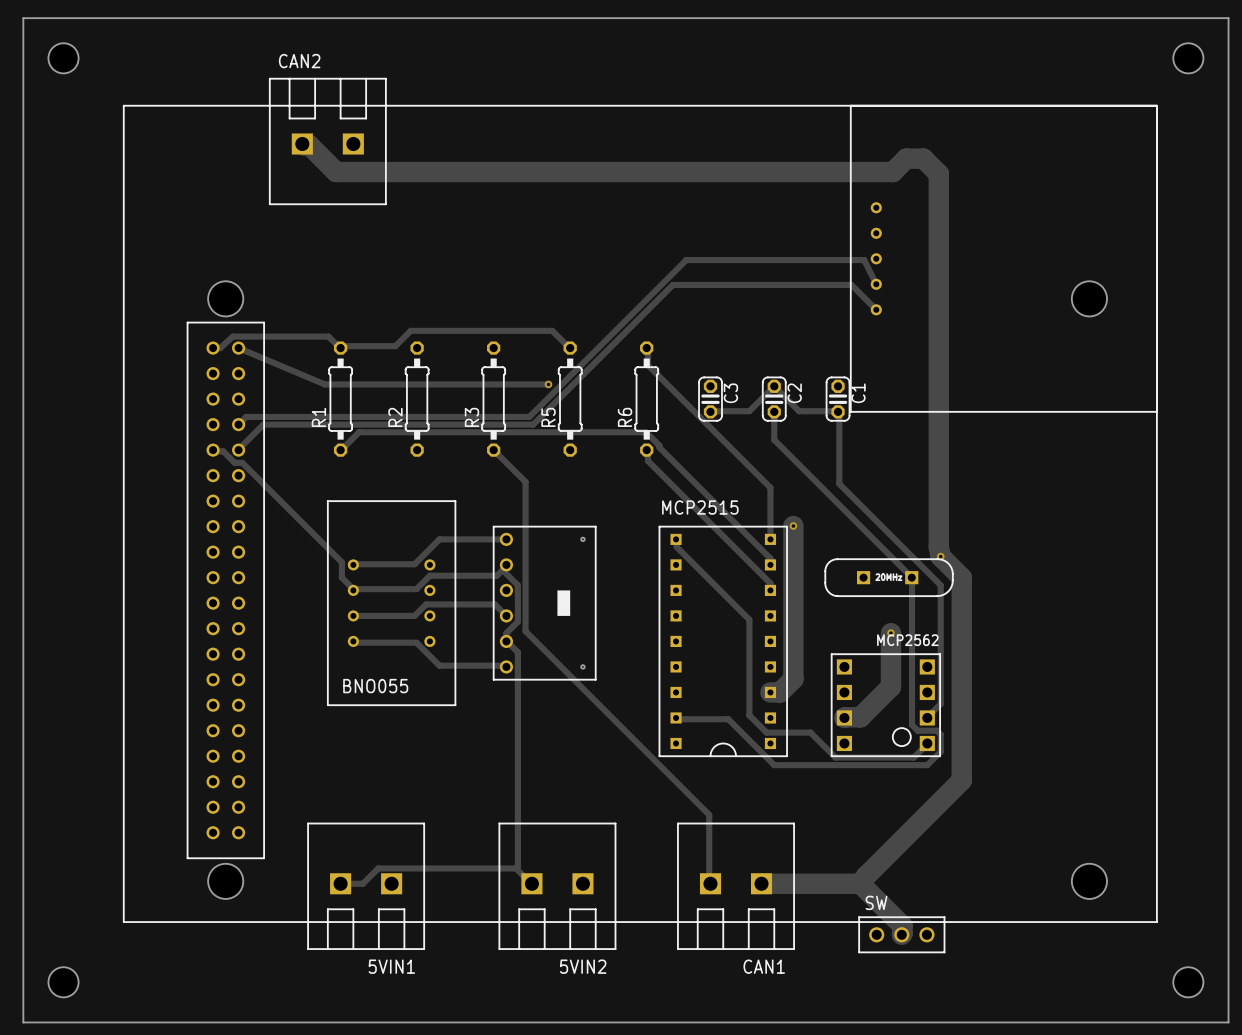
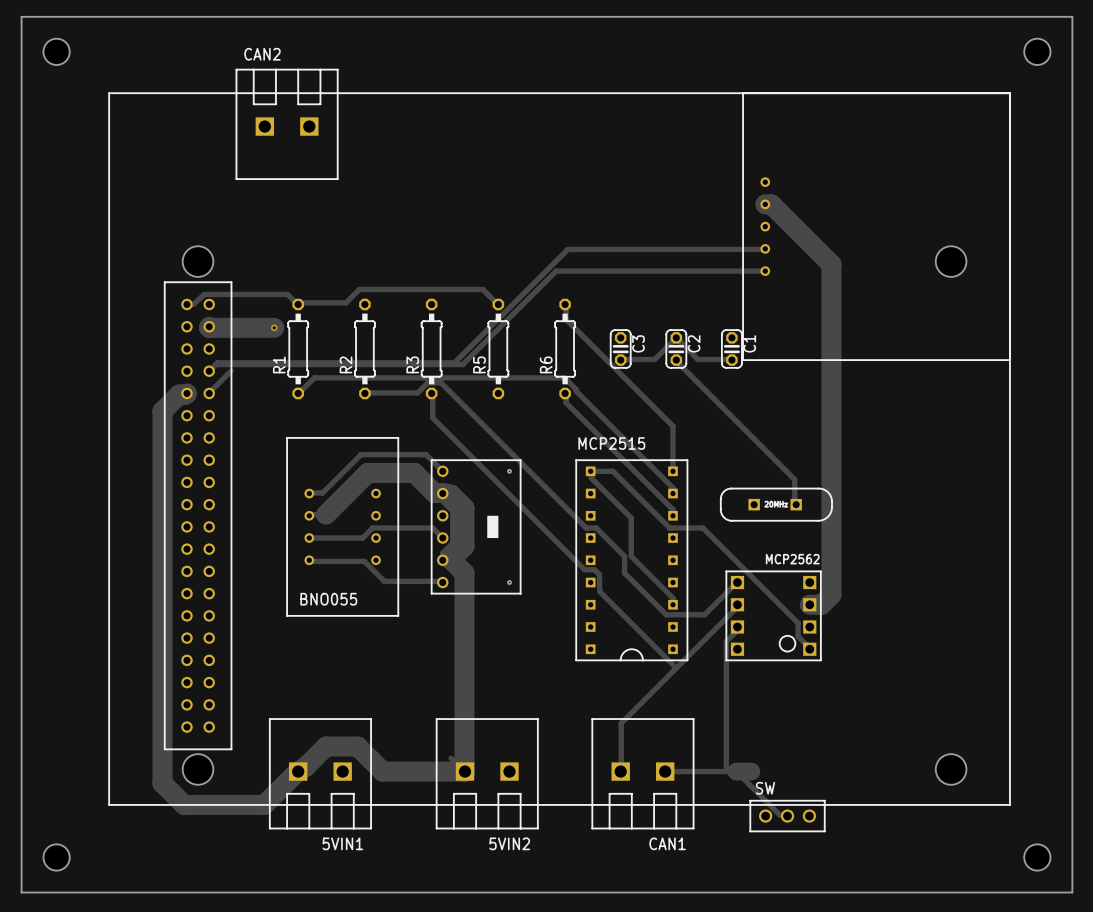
track: (302, 143) (309, 145) (336, 172) (892, 172) (906, 158) (923, 158) (938, 173) (938, 547) (940, 556) (961, 577) (961, 780) (860, 883) (902, 925) (901, 934) -> (736, 771) (779, 814) (787, 816)
track: none -> (765, 204) (771, 204) (831, 264) (831, 594) (821, 604) (809, 604)
track: (672, 284) (533, 424) (263, 424) -> (587, 249) (567, 249) (454, 362) (217, 362) (215, 364)
track: (851, 284) (876, 309) -> (743, 249) (765, 248)
track: (876, 284) (864, 260) (686, 260) (636, 309) -> (765, 271) (556, 271)
track: (238, 348) (324, 384) (548, 384) -> none
track: none -> (209, 326) (274, 327)
via: none -> (274, 327)
via: (548, 384) -> none
track: (838, 411) (839, 483) (940, 585) (940, 703) (927, 717) -> none
track: (774, 413) (774, 439) (912, 577) (912, 724) (917, 730) (936, 730) (940, 734) (940, 751) (927, 765) (774, 765) -> (676, 361) (794, 479) (796, 504)
track: (213, 450) (223, 451) (234, 462) (242, 462) (341, 562) (341, 577) (353, 590) -> (186, 393) (179, 394) (162, 411) (162, 783) (184, 804) (264, 804) (326, 746) (357, 746) (382, 771) (464, 771)
track: none -> (364, 393) (417, 392) (427, 382) (441, 382) (586, 528) (596, 528) (624, 556) (624, 573) (666, 614) (704, 614) (737, 582)
track: (494, 451) (525, 481) (525, 631) (709, 814) (710, 883) -> (432, 394) (432, 417) (584, 569) (594, 569) (599, 574) (599, 591) (636, 628)
track: (793, 526) (793, 679) (780, 692) (770, 692) -> (631, 518) (631, 556) (672, 598) (672, 604)
via: (793, 526) -> none
track: (506, 539) (439, 539) (414, 564) (368, 564) -> (442, 471) (426, 454) (361, 454) (322, 492)
via: (940, 556) -> none
track: (506, 564) (496, 575) (429, 575) (416, 589) (372, 589) -> (465, 771) (464, 573) (451, 559) (464, 546) (464, 508) (451, 494) (434, 492) (414, 472) (367, 472) (326, 514)
track: (722, 592) (749, 619) (749, 715) (766, 732) (810, 732) (835, 757) (913, 757) (927, 743) -> (591, 471) (612, 471) (669, 528) (703, 528) (798, 623) (798, 636) (809, 649)
track: (890, 633) (890, 686) (860, 717) (844, 717) -> (726, 771) (726, 641) (736, 631) (737, 627)
via: (890, 633) -> none
track: (506, 641) (517, 652) (517, 866) (515, 868) (378, 868) (362, 883) (340, 883) -> none
track: none -> (737, 604) (736, 608) (621, 723) (620, 771)
track: (676, 717) (728, 719) -> none
track width: thick (761, 883) (843, 883) -> thin (665, 771) (736, 771)

